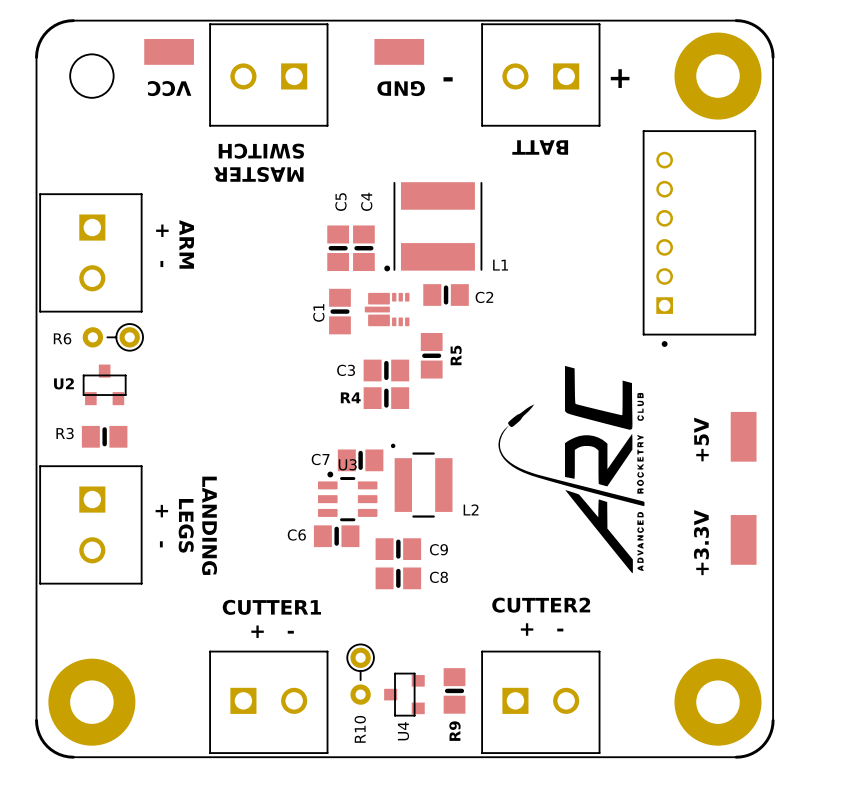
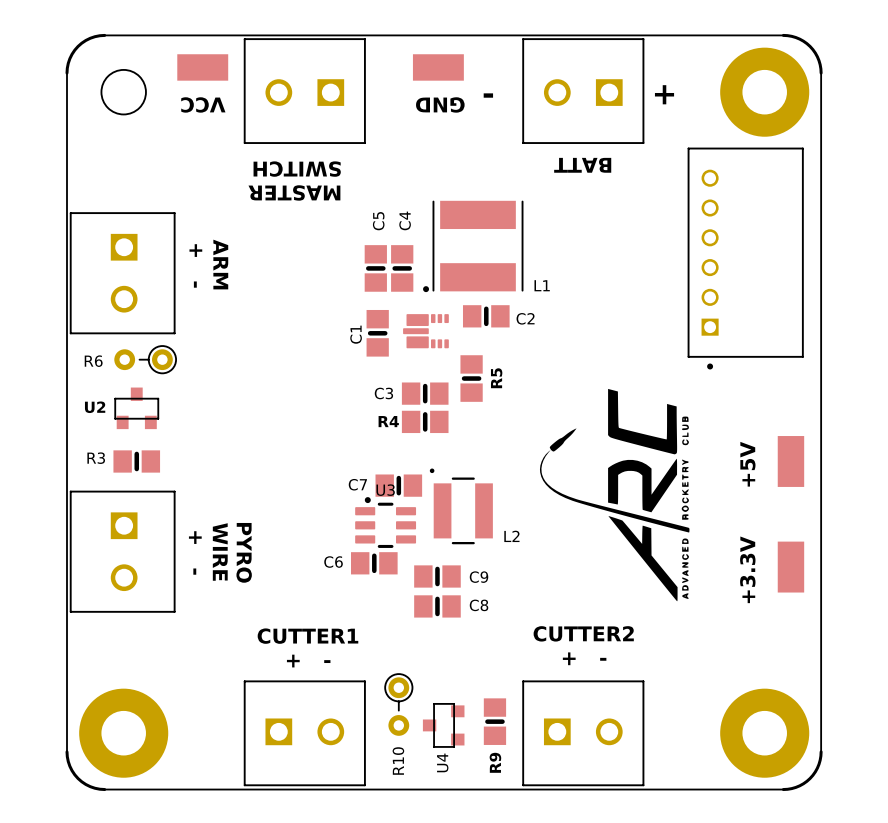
text: LEGS (186, 525) -> WIRE (220, 551)
text: LANDING (209, 525) -> PYRO (244, 552)

